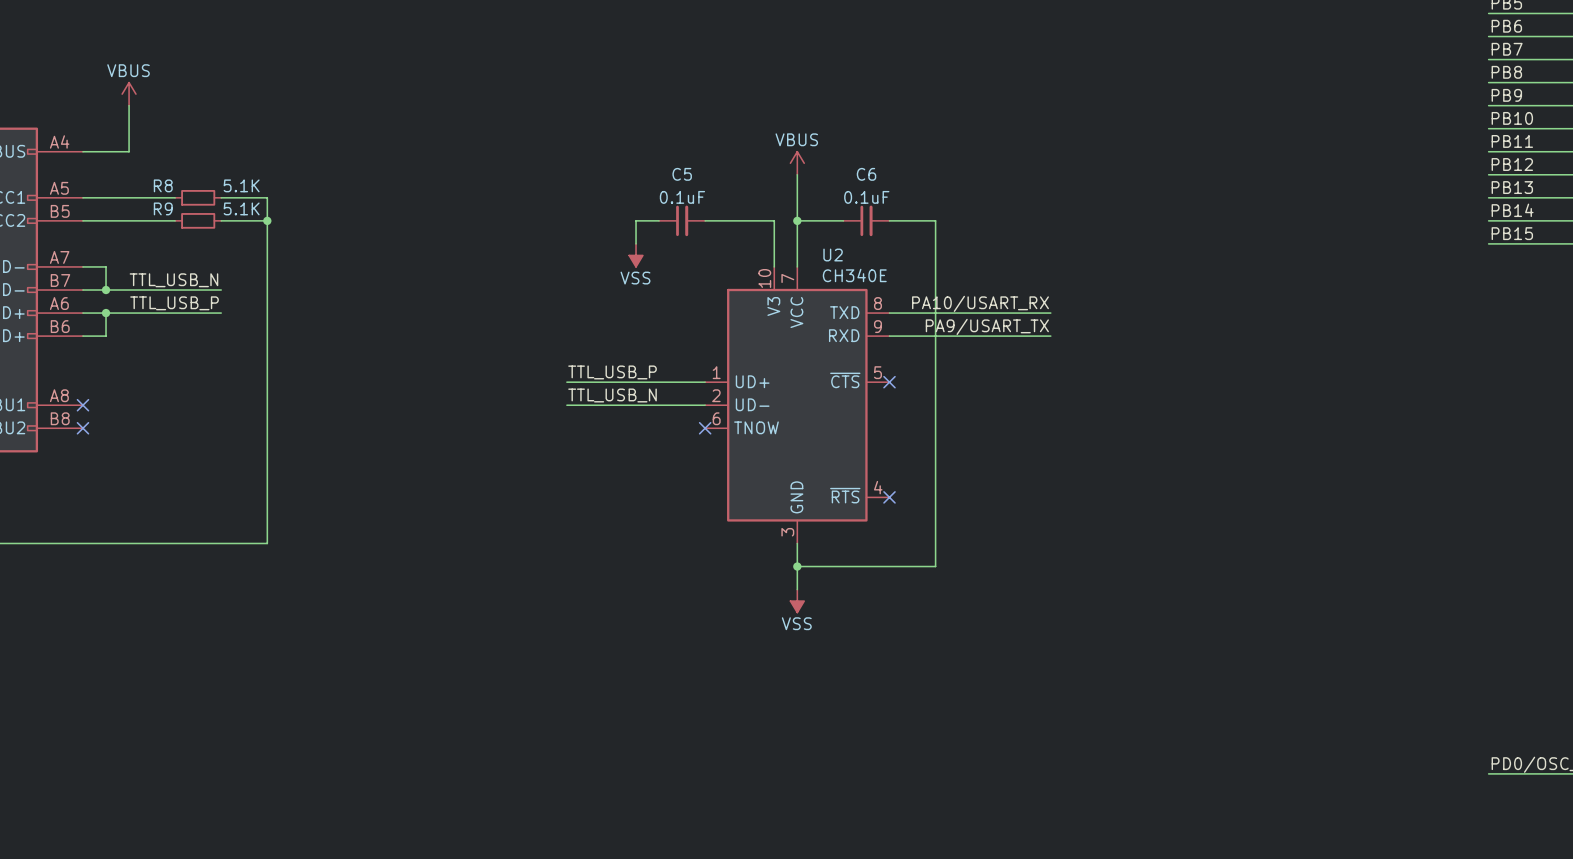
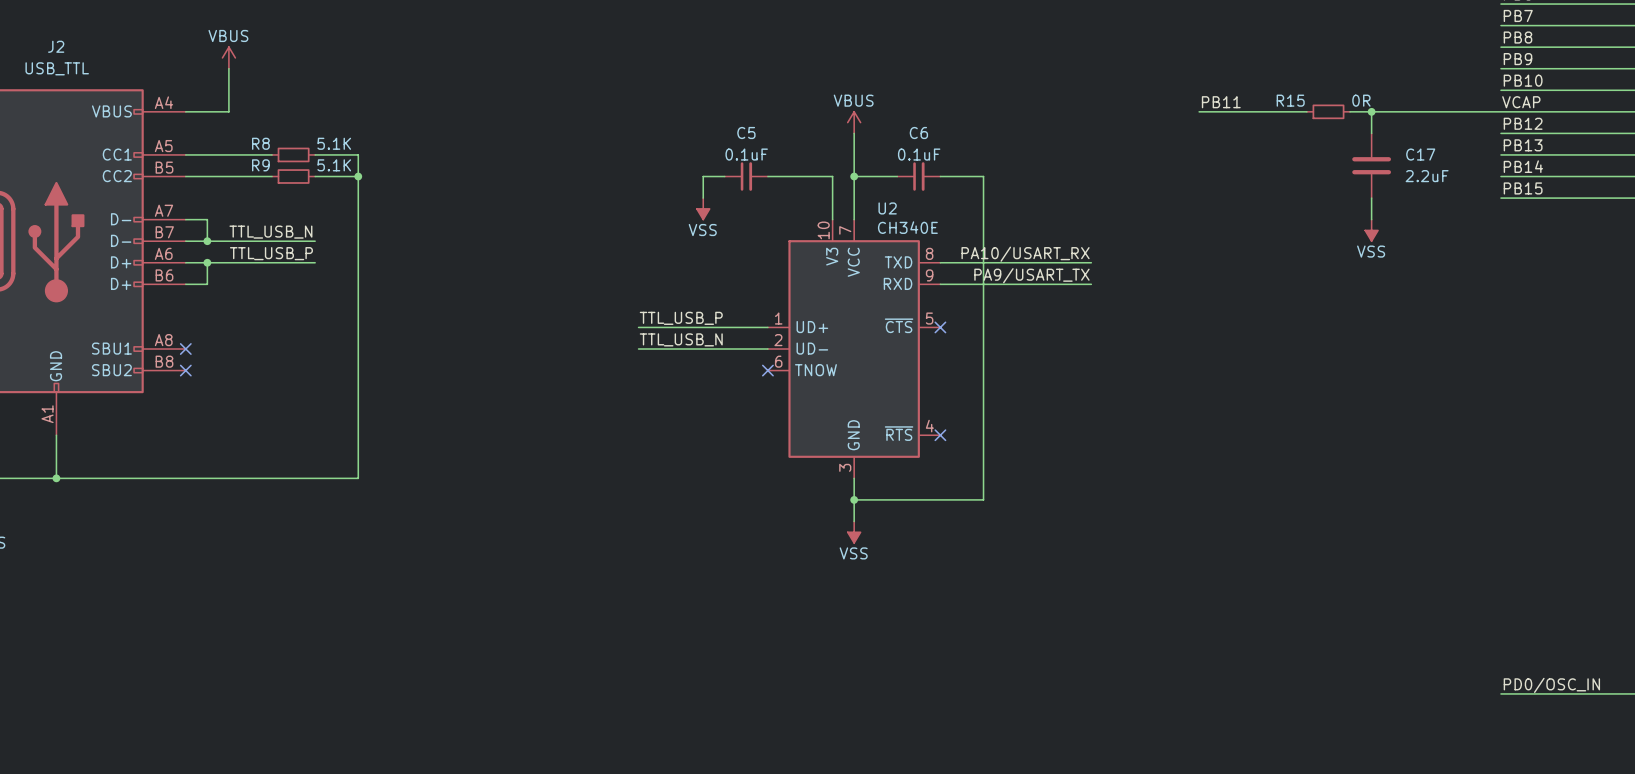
label: none -> PB11 (1221, 102)
label: PB11 (1512, 141) -> VCAP (1521, 102)
wire: none -> (1199, 111) (1306, 111)
R15: none -> 0R (1328, 111)
wire: none -> (1350, 111) (1500, 111)
wire: none -> (1371, 111) (1371, 133)
junction: none -> (1371, 111)
C17: none -> 2.2uF (1371, 165)
wire: none -> (1371, 198) (1371, 219)
power symbol: none -> VSS (1371, 230)

